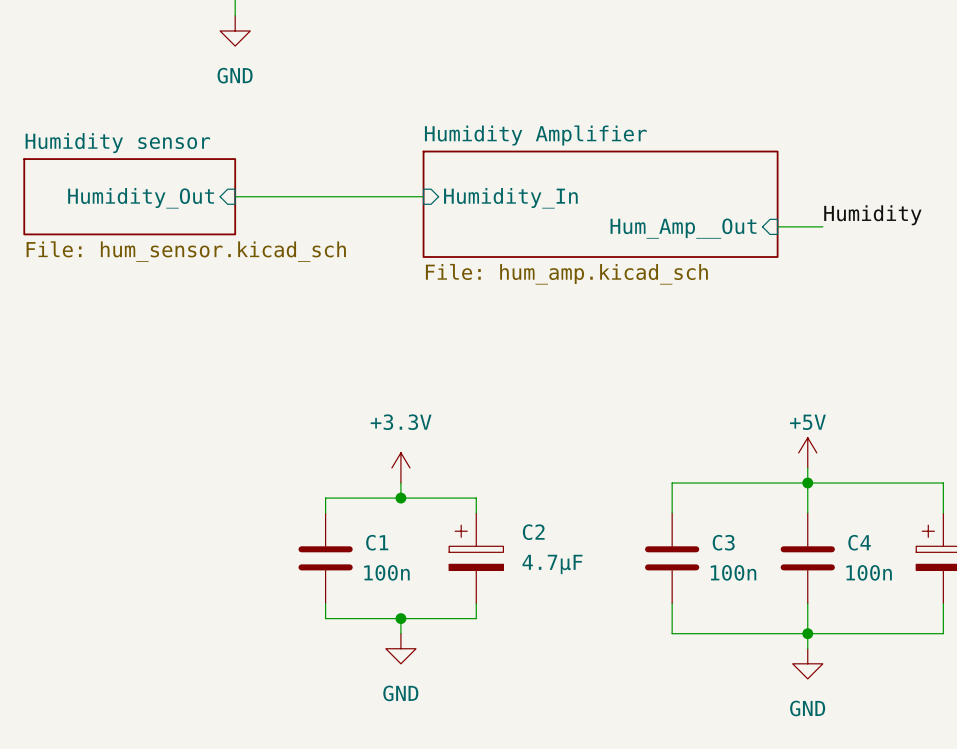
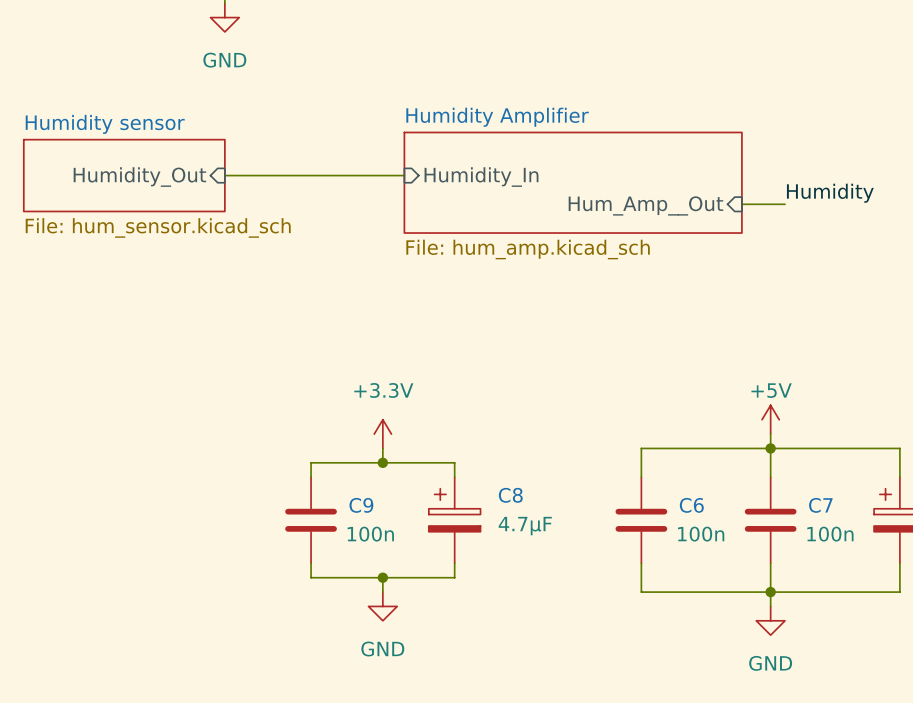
C2 name: C2 (533, 532) -> C8 (510, 495)
C1 name: C1 (377, 542) -> C9 (361, 505)
C3 name: C3 (723, 542) -> C6 (691, 505)
C4 name: C4 (859, 542) -> C7 (820, 505)

